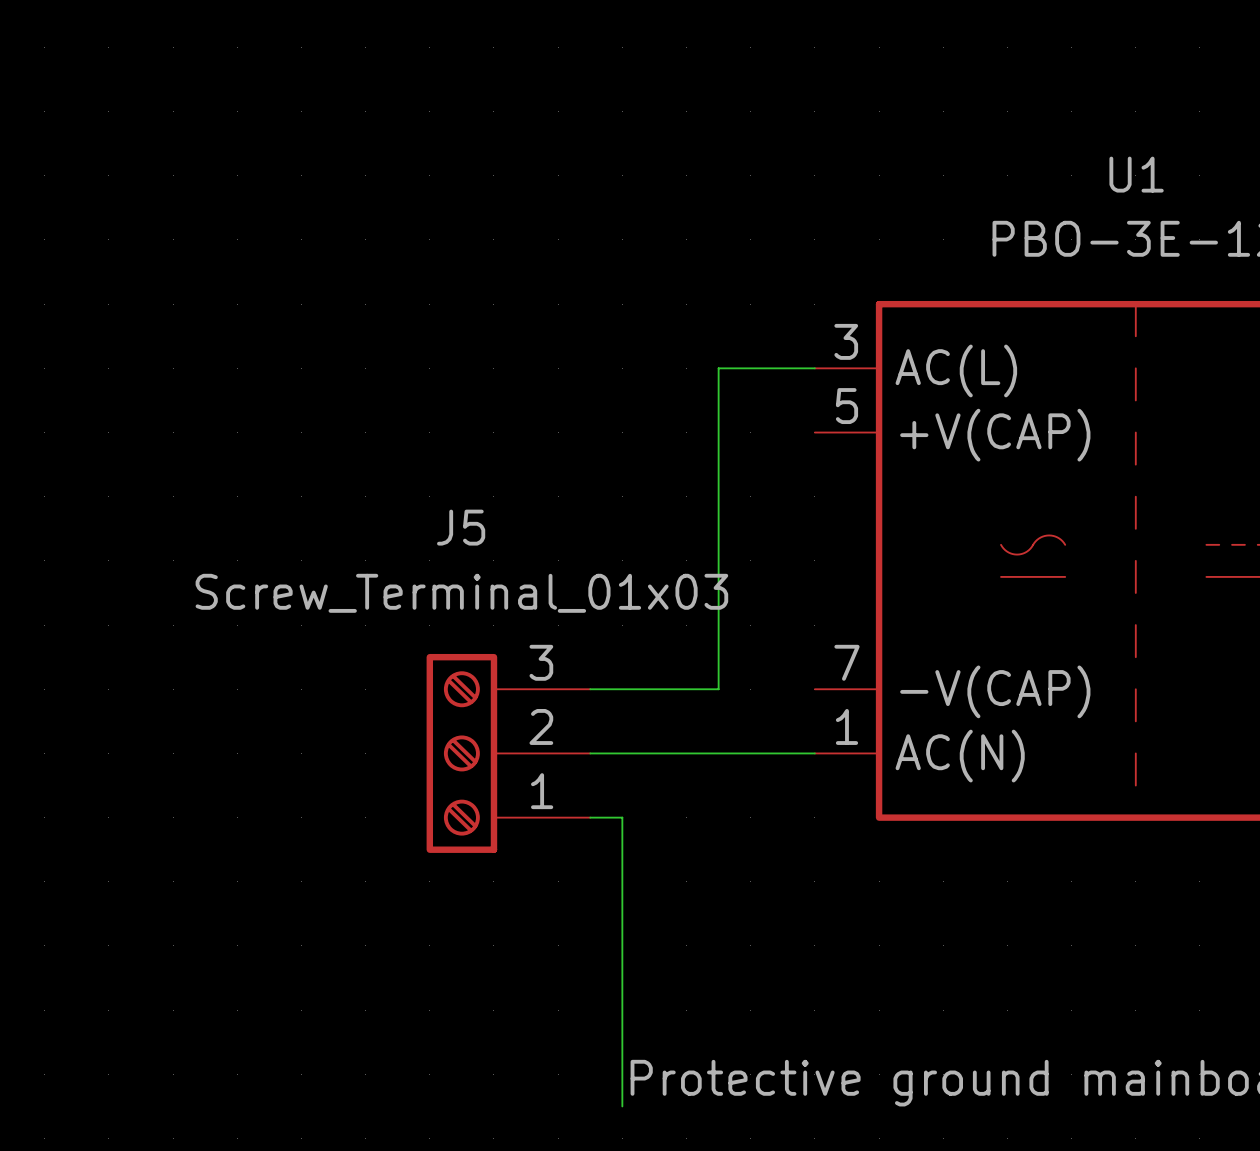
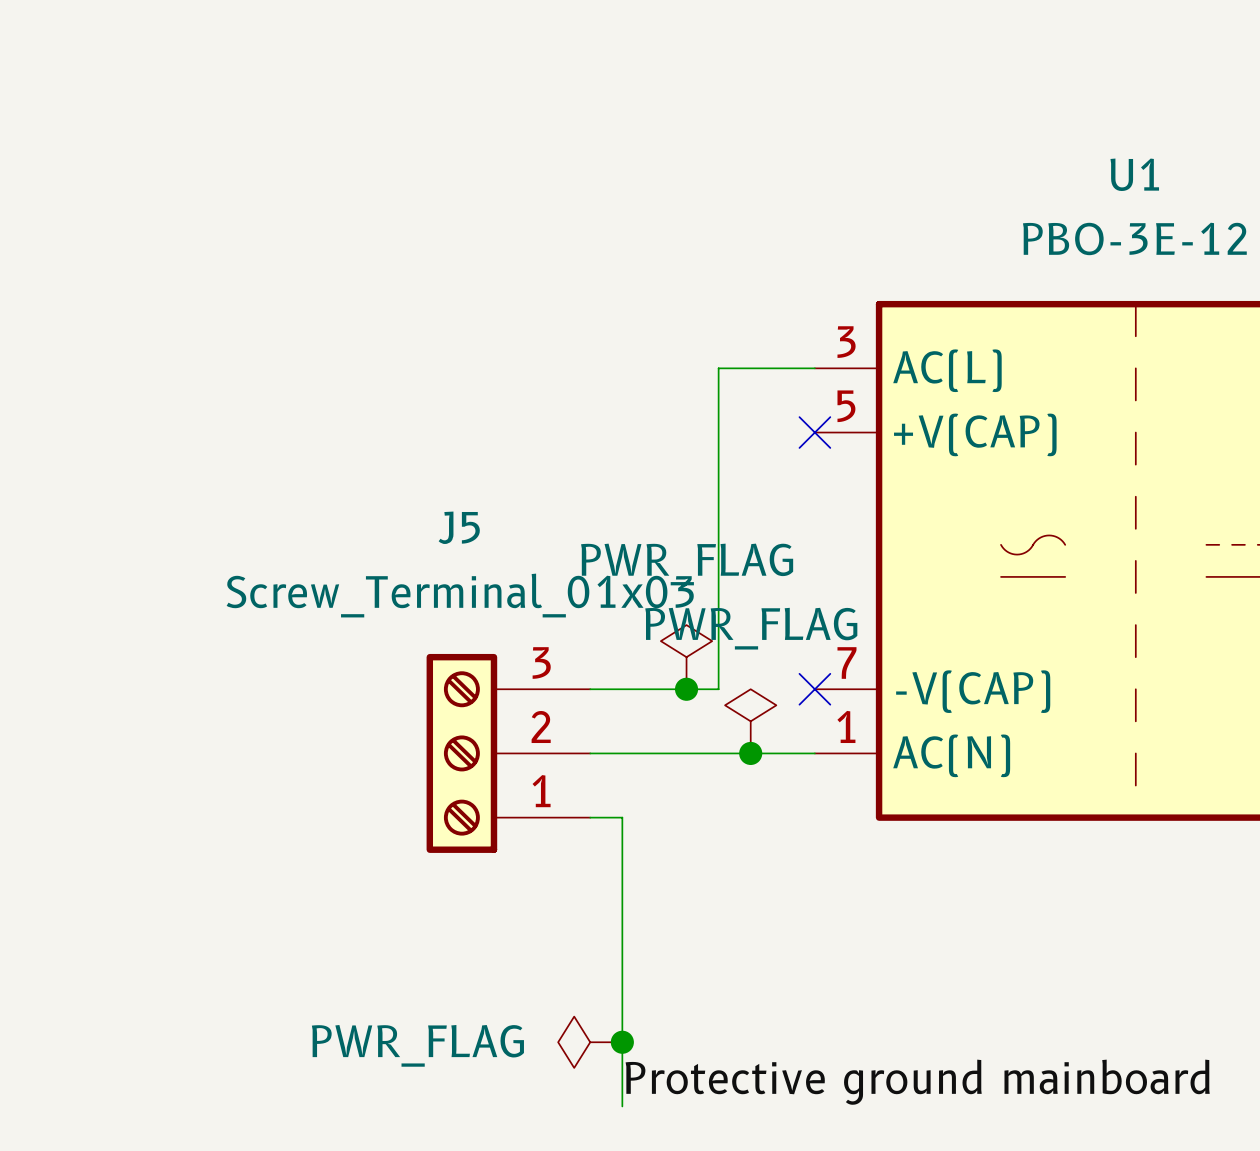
no-connect mark: none -> (814, 432)
power symbol: none -> PWR_FLAG (686, 657)
junction: none -> (686, 689)
no-connect mark: none -> (814, 689)
power symbol: none -> PWR_FLAG (750, 721)
junction: none -> (750, 753)
power symbol: none -> PWR_FLAG (590, 1042)
junction: none -> (622, 1042)

